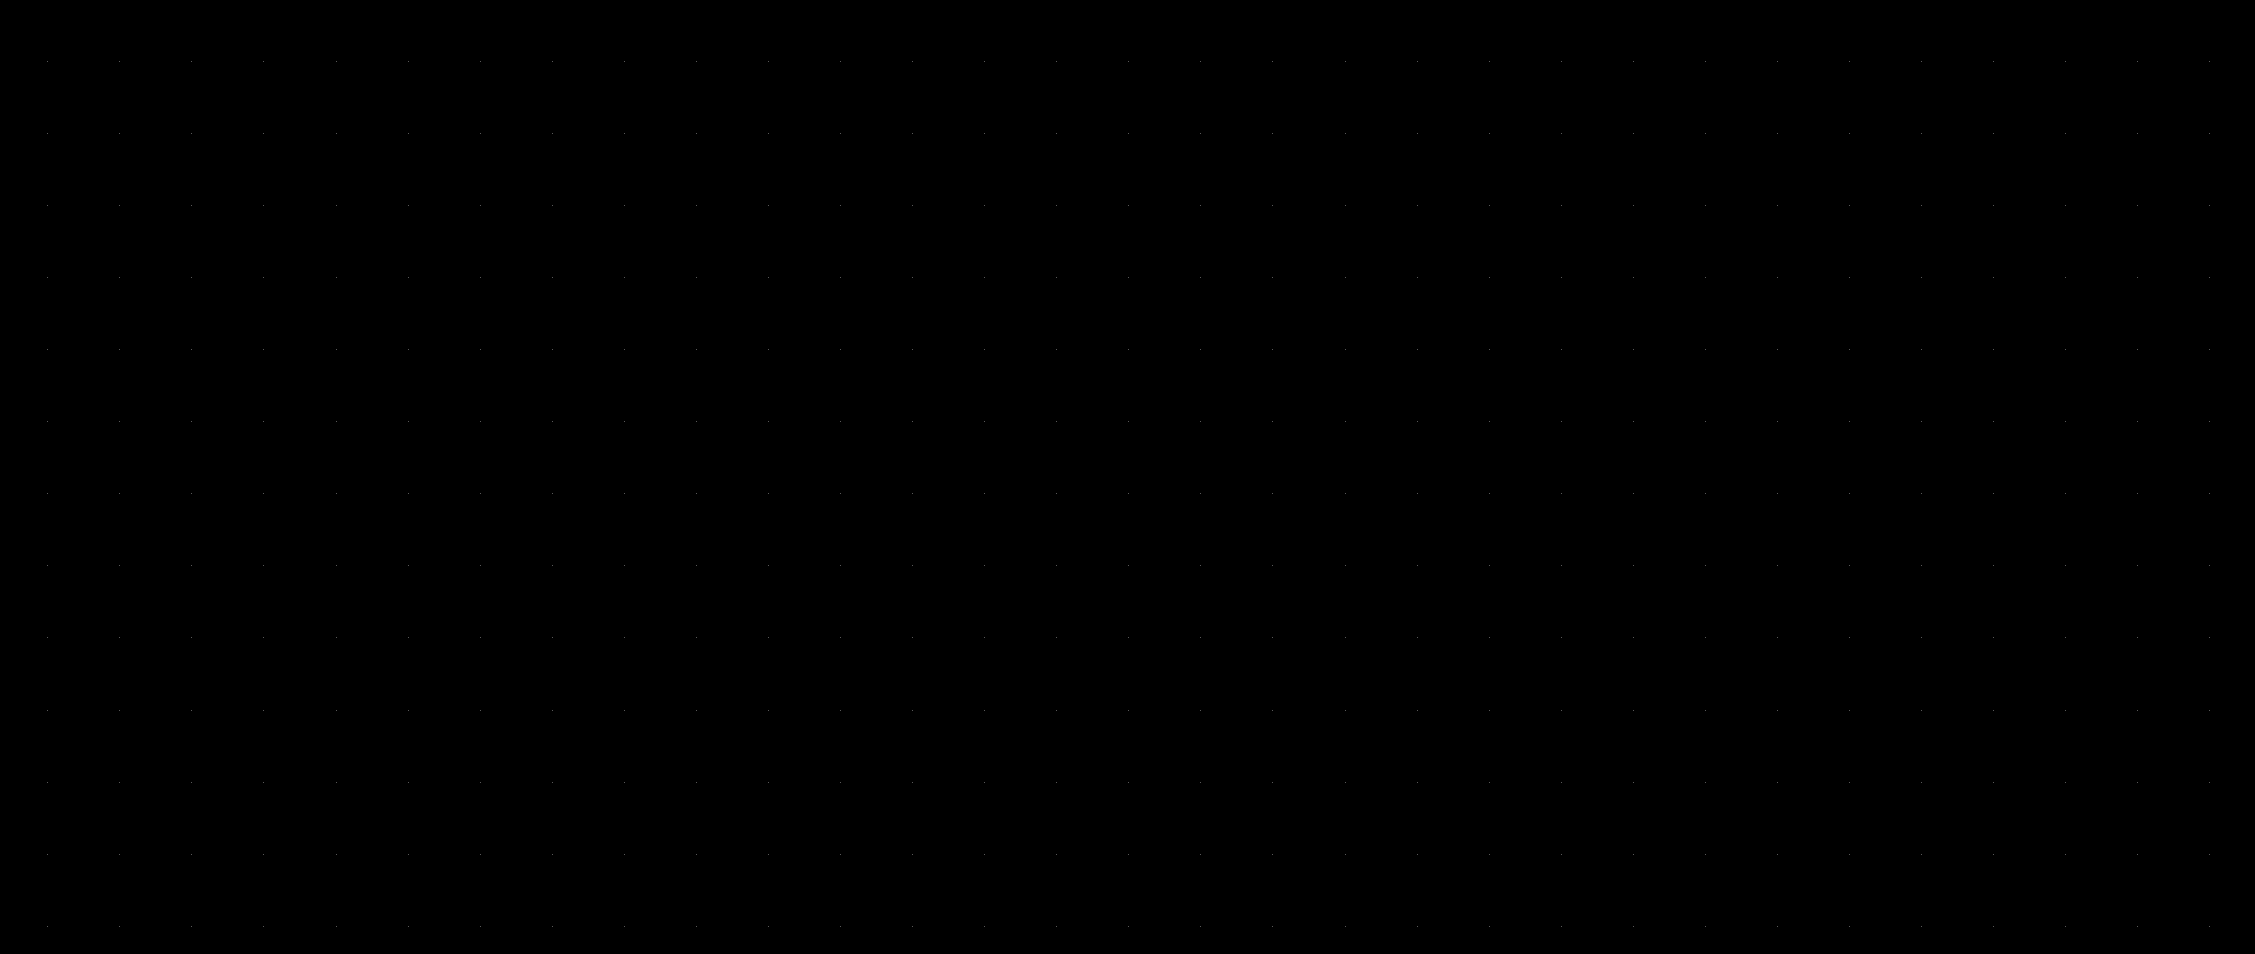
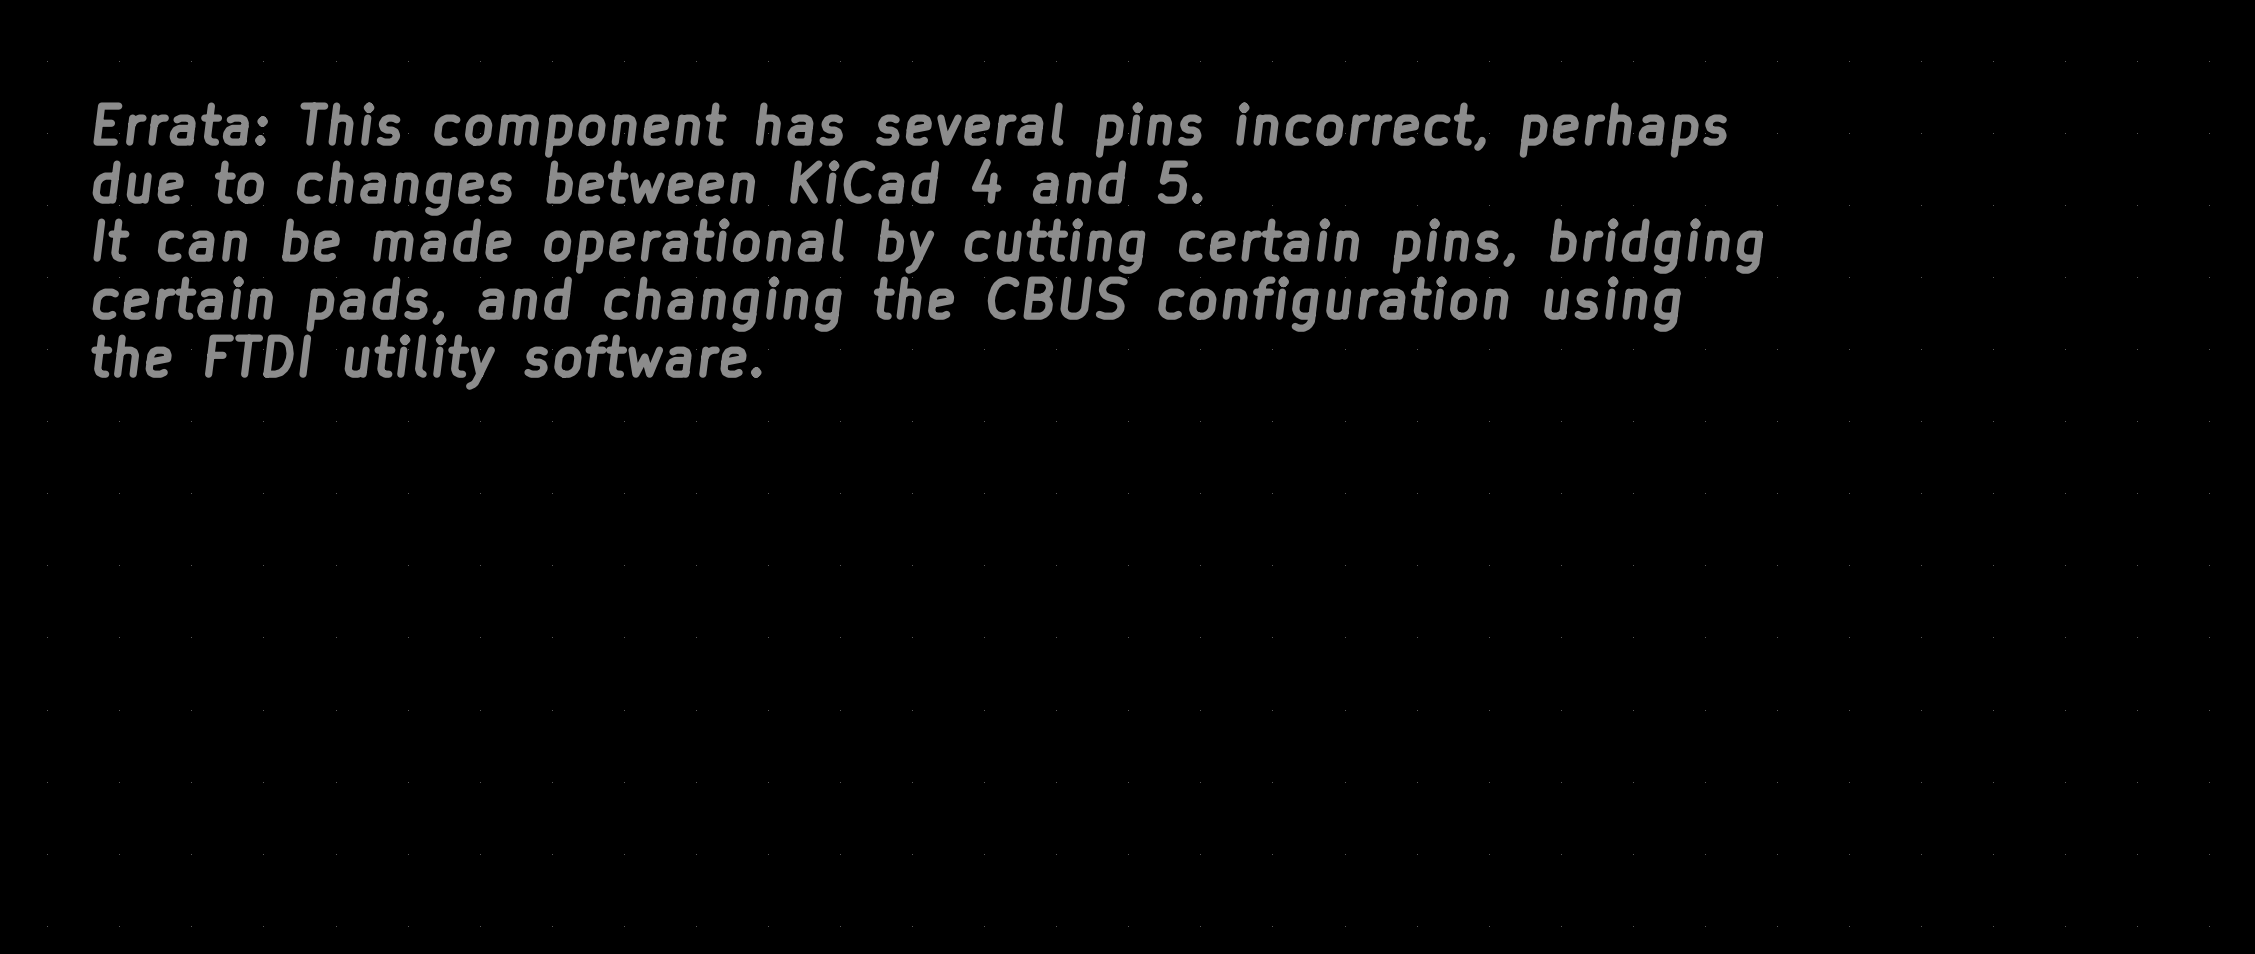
text: none -> Errata: This component has several pins incorrect, perhaps (910, 130)
text: none -> due to changes between KiCad 4 and 5. (647, 187)
text: none -> It can be made operational by cutting certain pins, bridging (928, 246)
text: none -> certain pads, and changing the CBUS configuration using (886, 304)
text: none -> the FTDI utility software. (426, 362)

